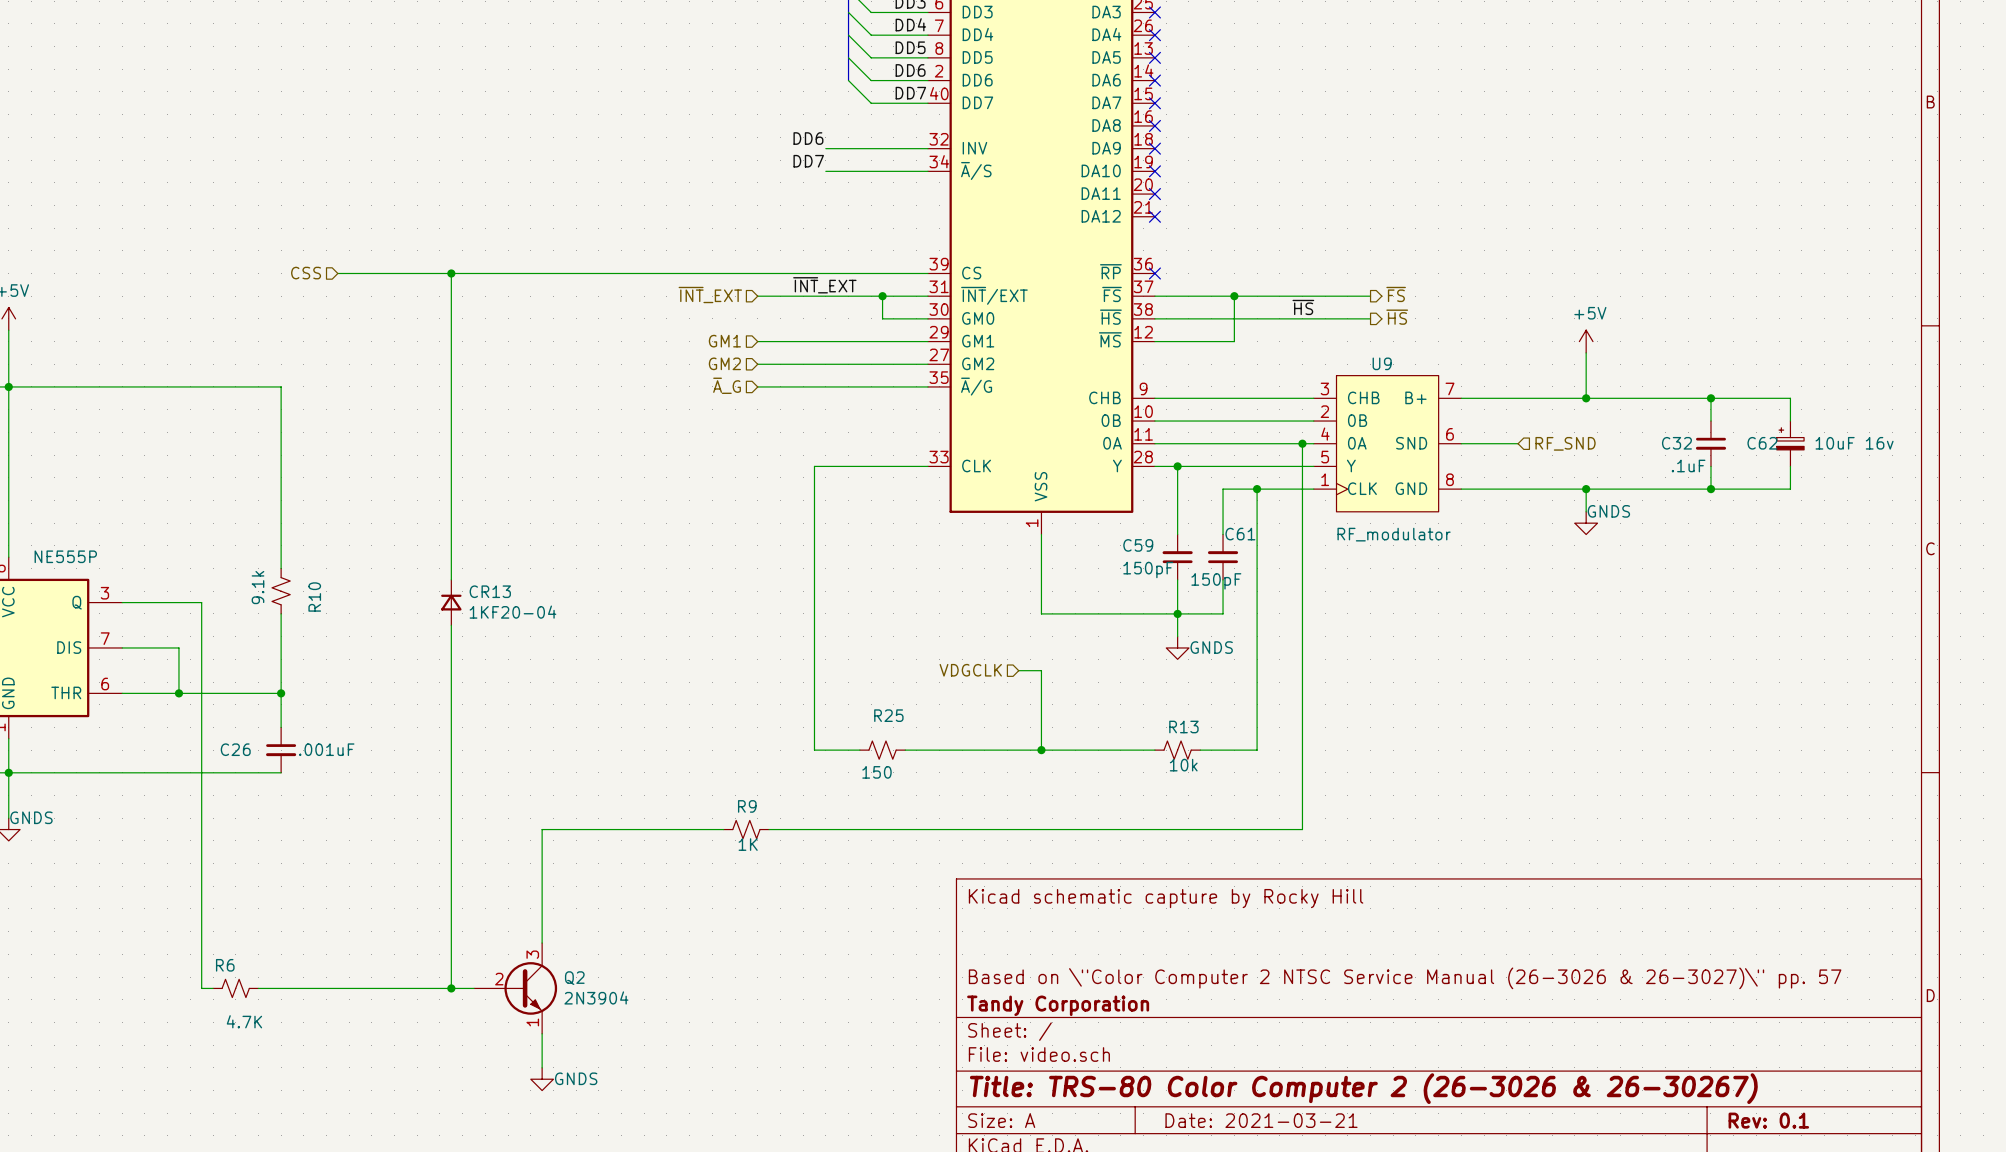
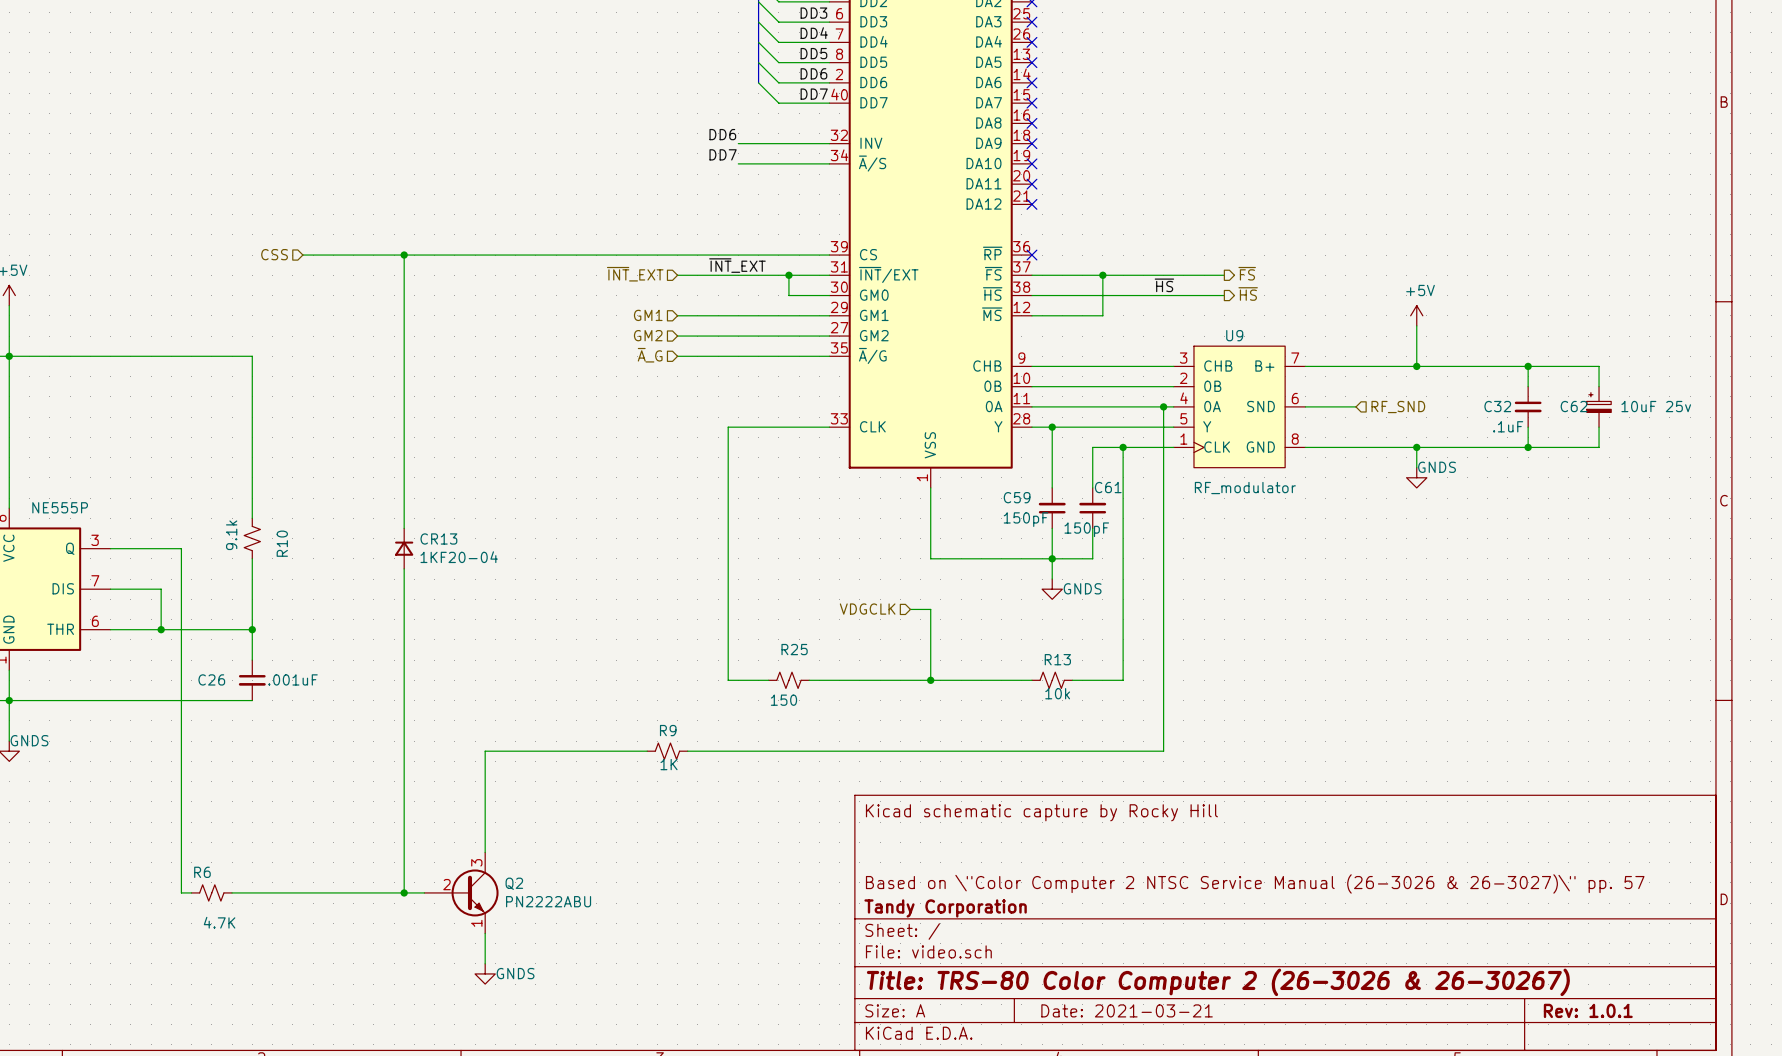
C62 value: 10uF 16v (1854, 443) -> 10uF 25v (1656, 406)
Q2 value: 2N3904 (596, 997) -> PN2222ABU (548, 901)
title block: Rev: 0.1 (1768, 1120) -> Rev: 1.0.1 (1588, 1010)

